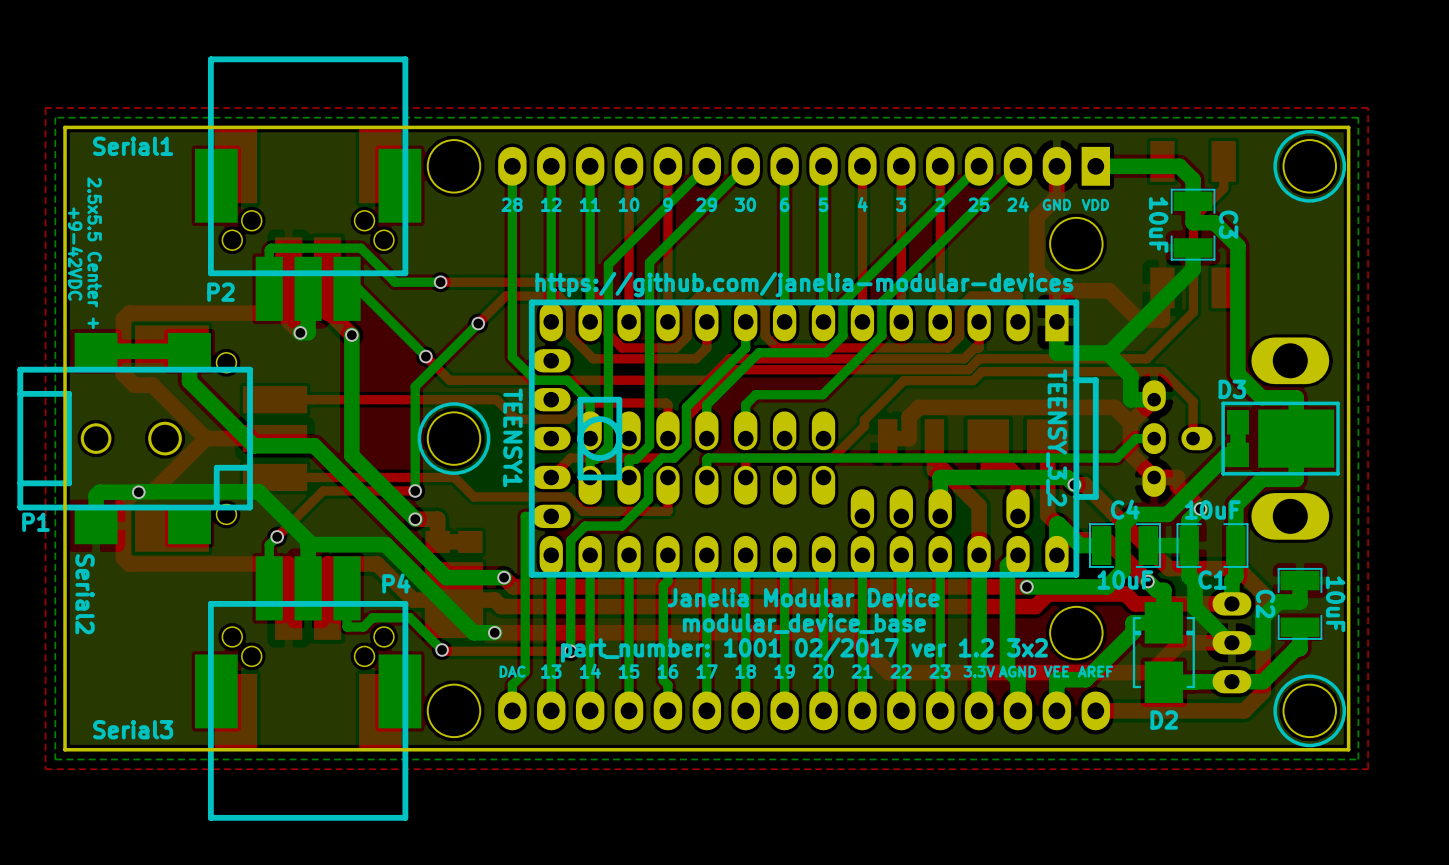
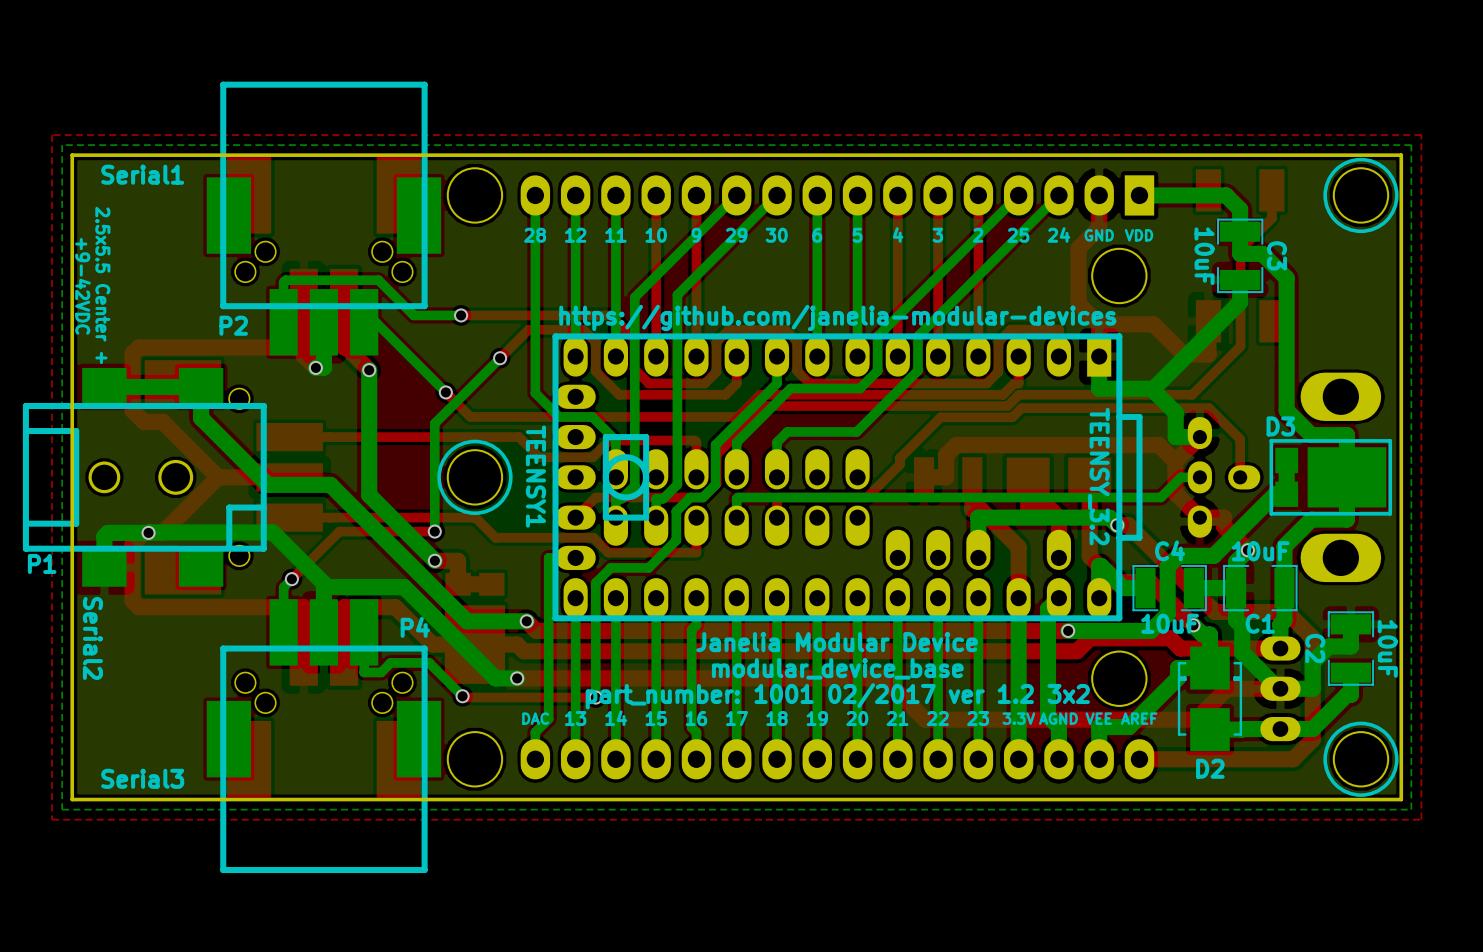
TEENSY1 value: TEENSY_3_2 (1056, 437) -> TEENSY_3.2 (1098, 476)

